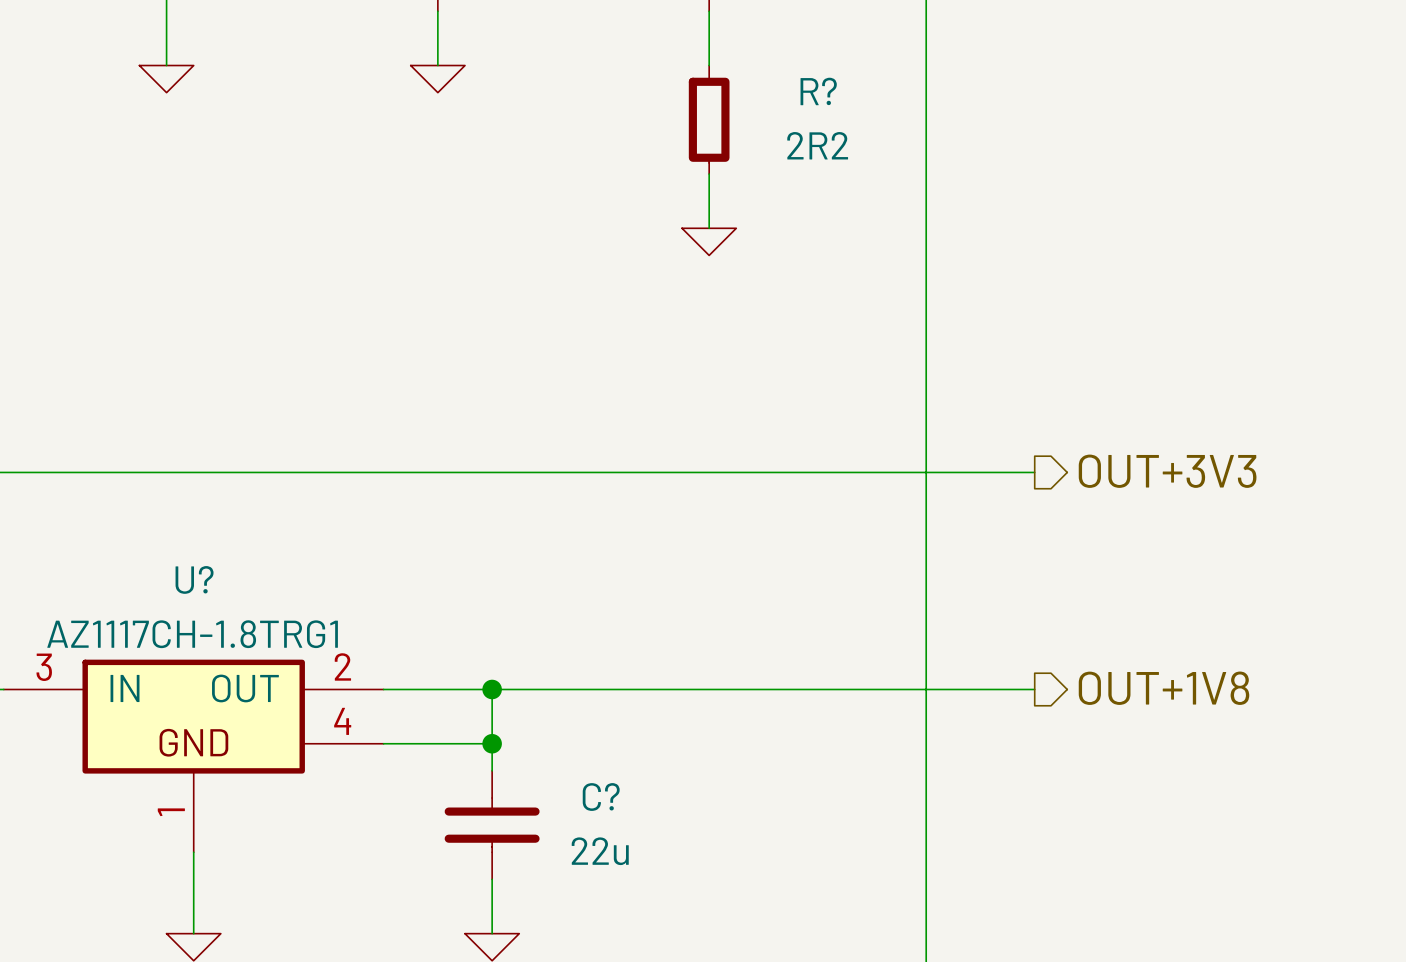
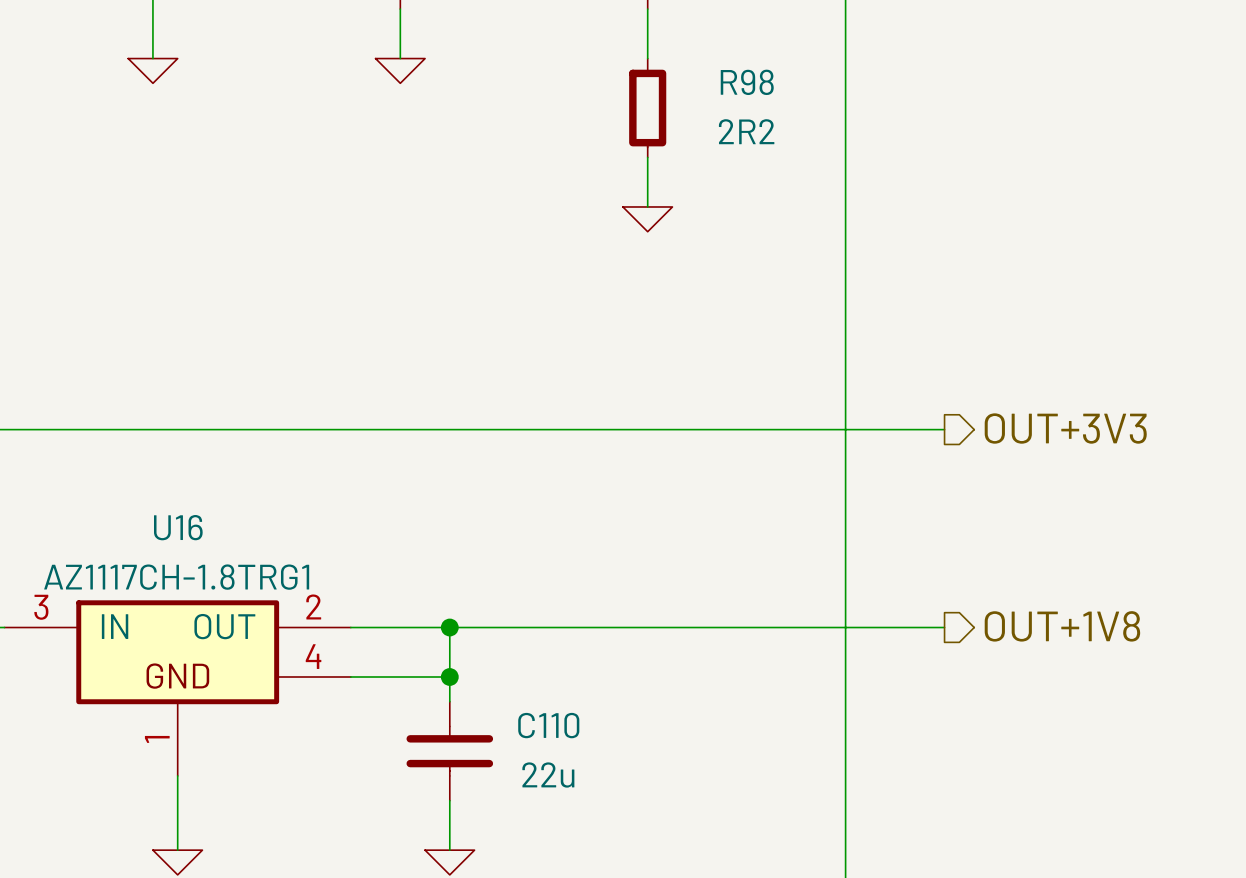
R? name: R? (818, 91) -> R98 (747, 82)
U? name: U? (194, 579) -> U16 (178, 527)
C? name: C? (601, 796) -> C110 (548, 725)

